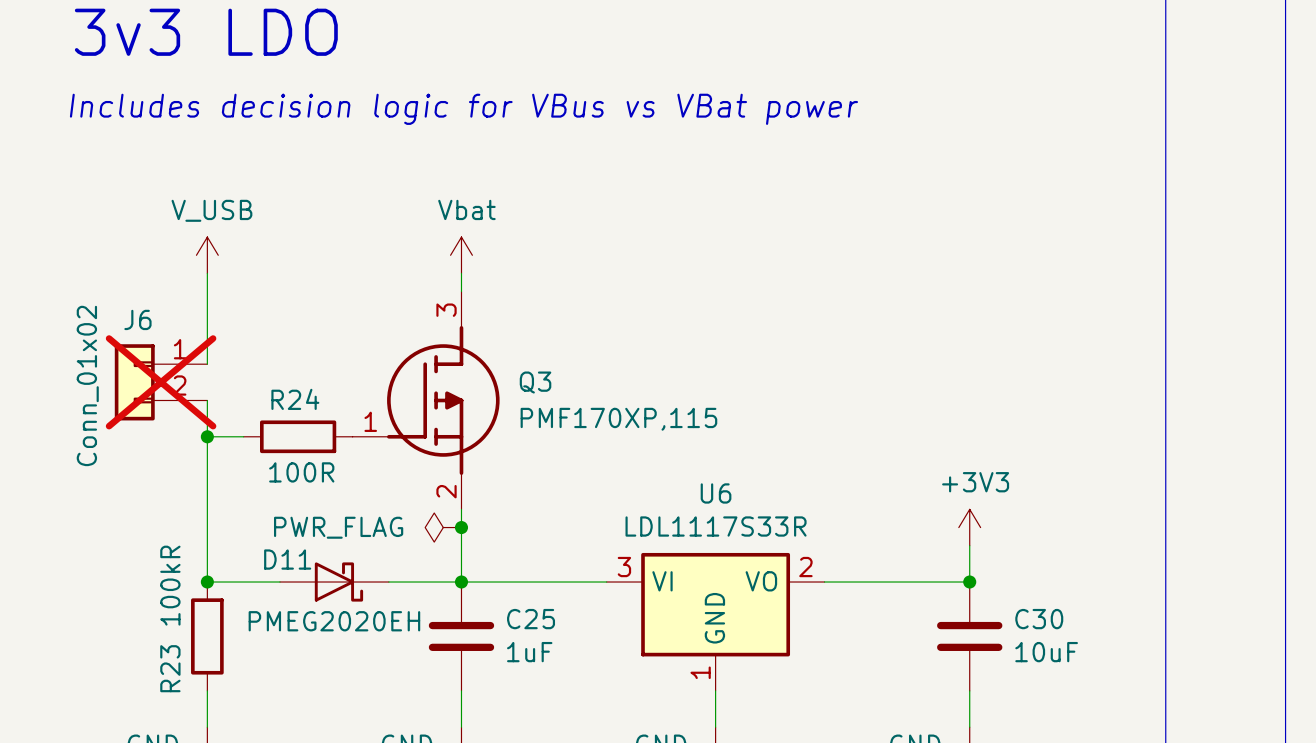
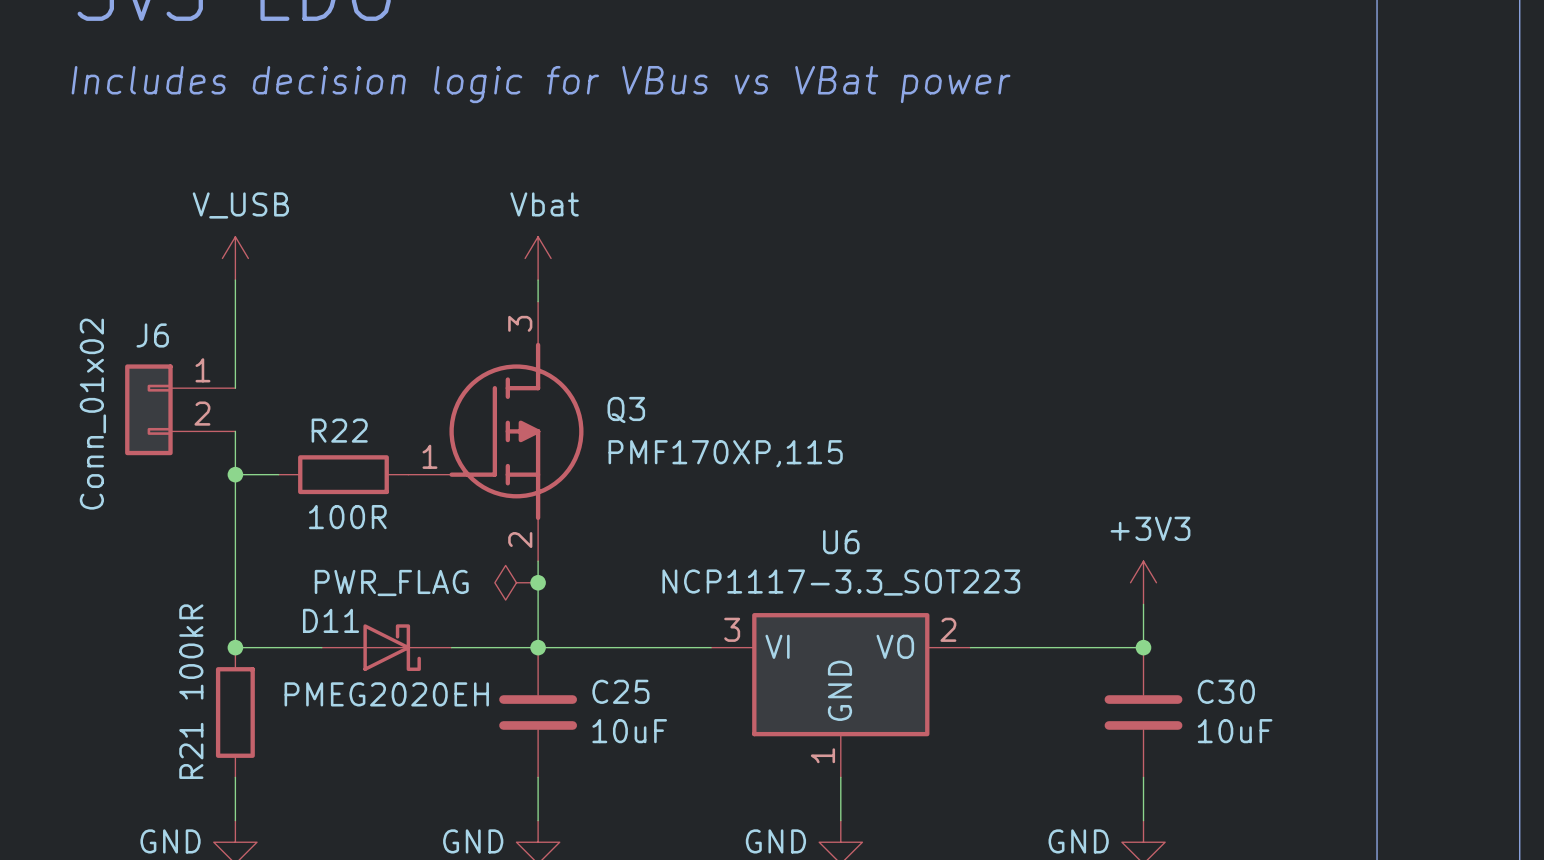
J6 do-not-place cross: (161, 382) -> none
R24 name: R24 (295, 399) -> R22 (339, 430)
U6 value: LDL1117S33R (716, 526) -> NCP1117-3.3_SOT223 (841, 582)
C25 value: 1uF (529, 652) -> 10uF (629, 731)
R23 name: R23 (170, 668) -> R21 (191, 750)

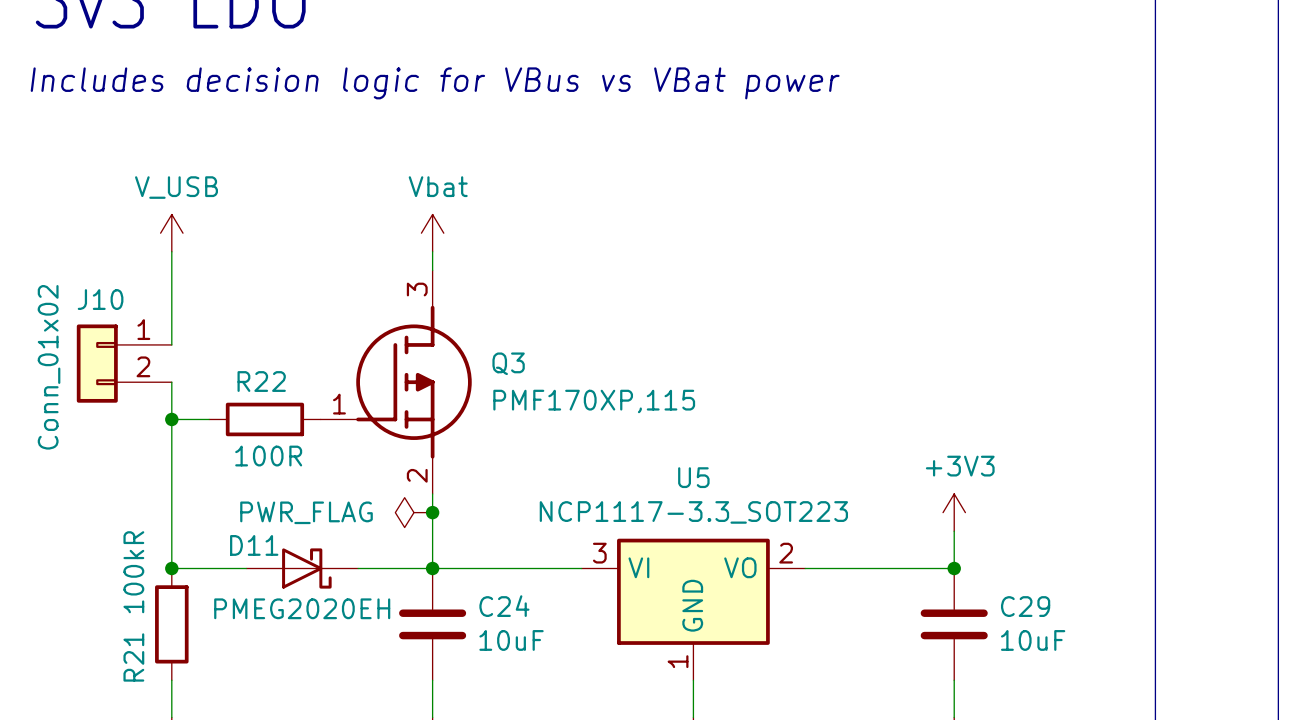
J6 name: J6 (152, 335) -> J10 (100, 299)
U6 name: U6 (841, 542) -> U5 (693, 477)
C25 name: C25 (620, 691) -> C24 (504, 606)
C30 name: C30 (1226, 691) -> C29 (1025, 606)

